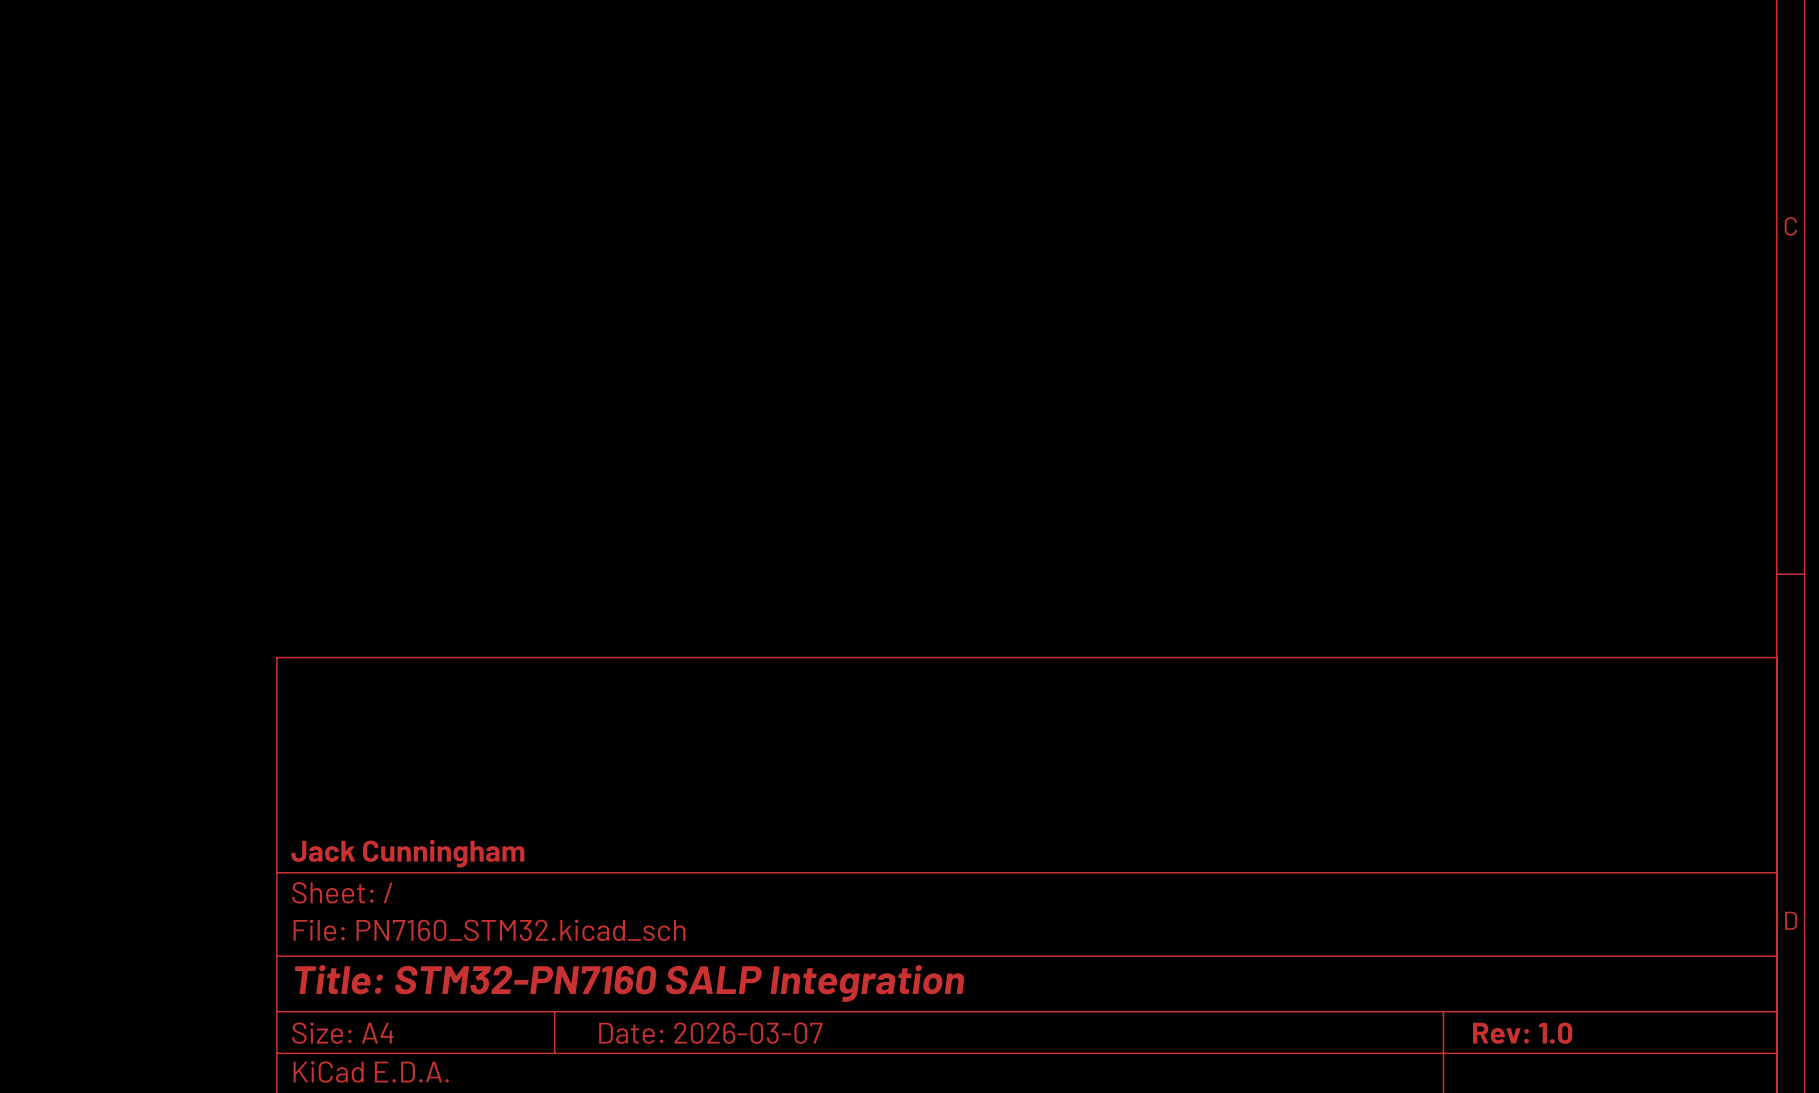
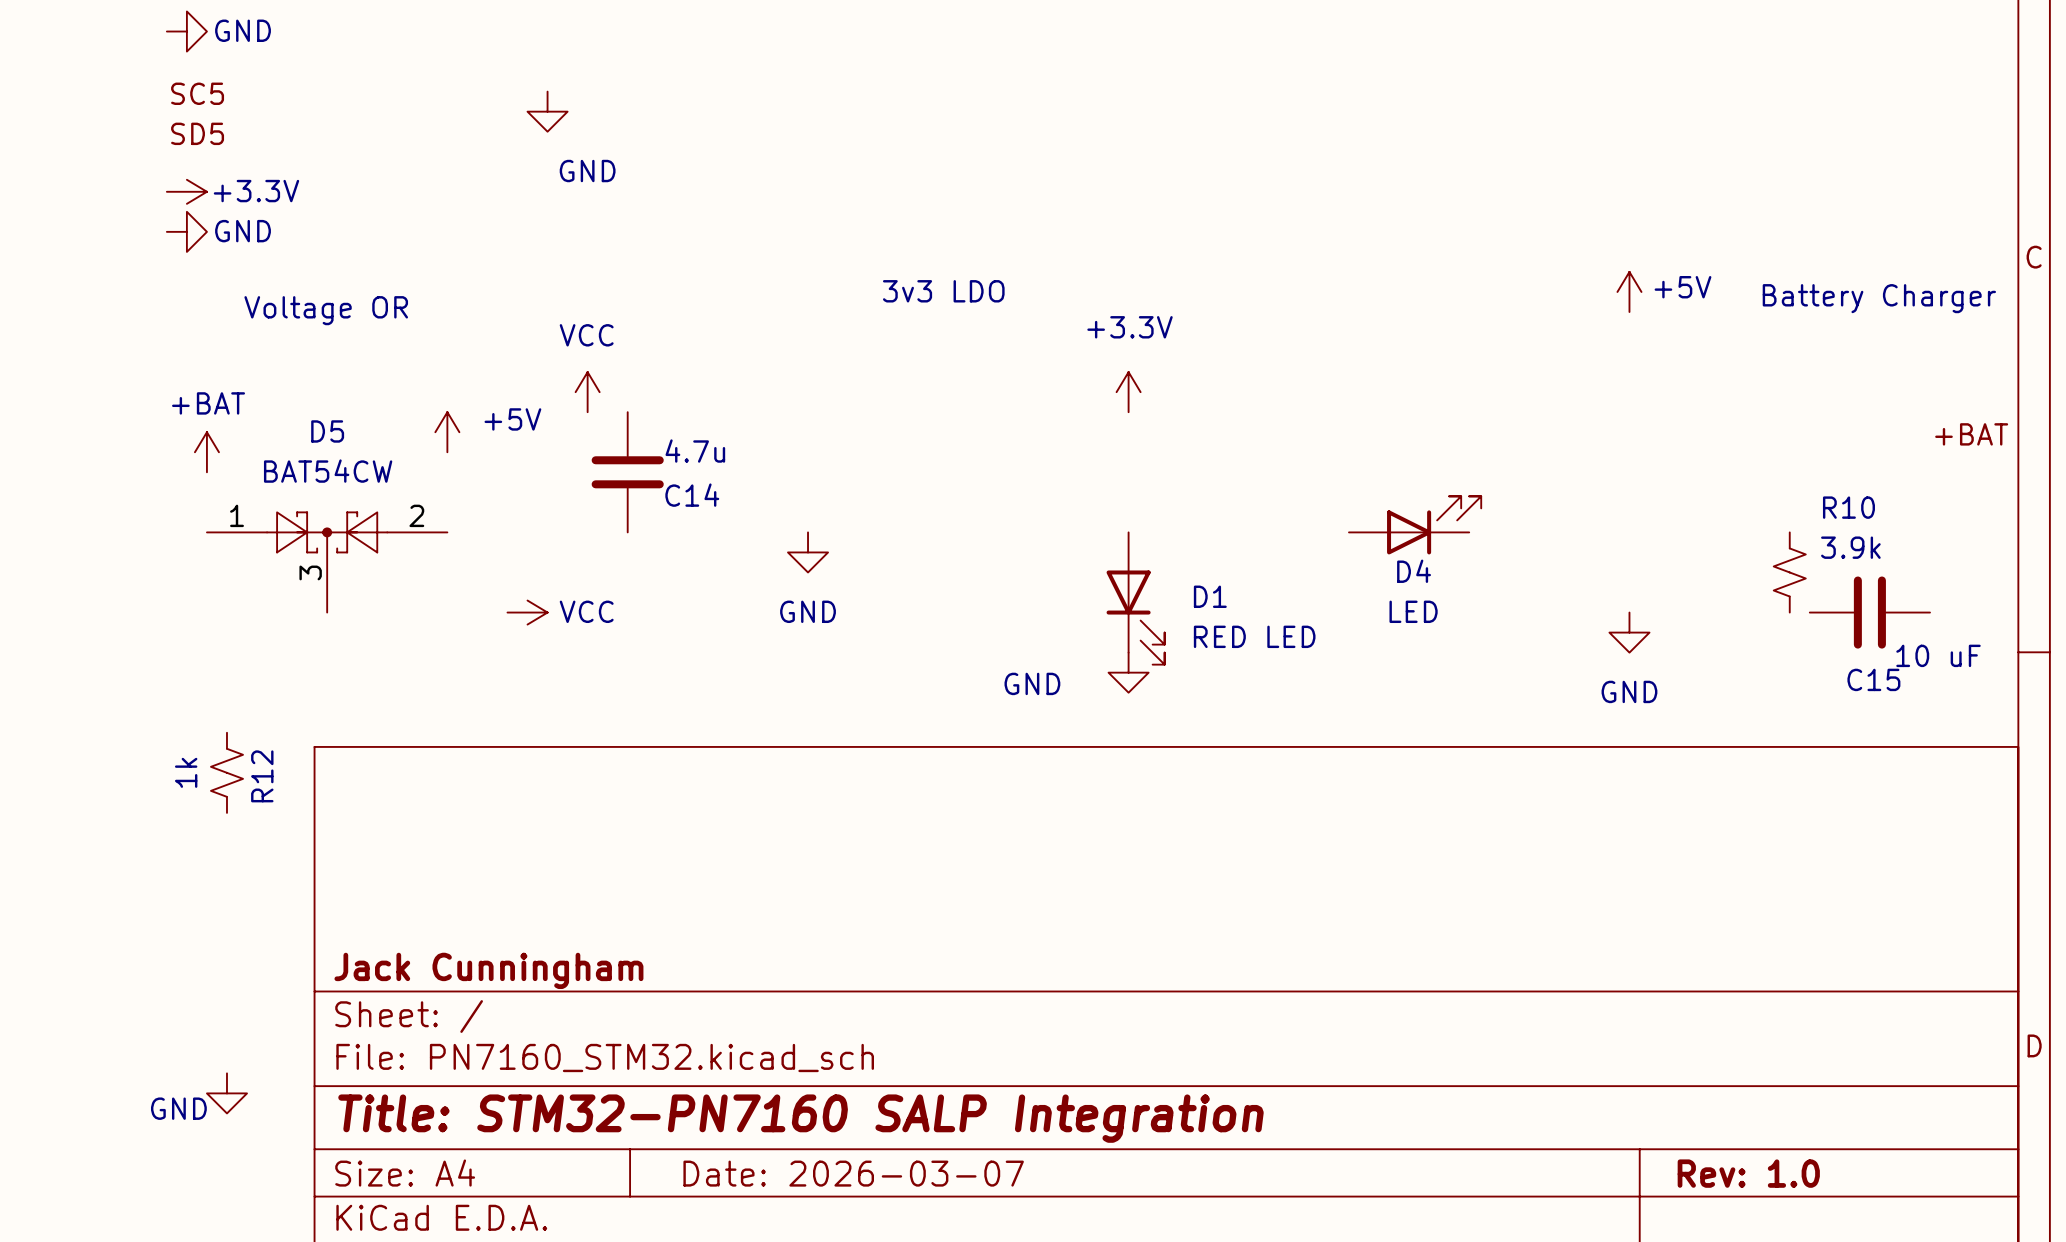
power symbol: none -> GND (186, 31)
label: none -> SC5 (197, 93)
power symbol: none -> GND (547, 111)
label: none -> SD5 (197, 133)
power symbol: none -> +3.3V (186, 191)
power symbol: none -> GND (186, 231)
text: none -> 3v3 LDO (943, 291)
power symbol: none -> +5V (1629, 291)
text: none -> Battery Charger (1879, 298)
text: none -> Voltage OR (326, 310)
power symbol: none -> VCC (587, 392)
power symbol: none -> +3.3V (1128, 392)
power symbol: none -> +5V (447, 432)
label: none -> +BAT (1971, 434)
power symbol: none -> +BAT (206, 452)
C14: none -> 4.7u (627, 472)
D4: none -> LED (1415, 525)
power symbol: none -> GND (808, 552)
D5: none -> BAT54CW (327, 562)
R10: none -> 3.9k (1789, 572)
D1: none -> RED LED (1135, 598)
power symbol: none -> VCC (527, 612)
C15: none -> 10 uF (1869, 612)
power symbol: none -> GND (1629, 632)
power symbol: none -> GND (1128, 672)
R12: none -> 1k (226, 772)
power symbol: none -> GND (226, 1093)

